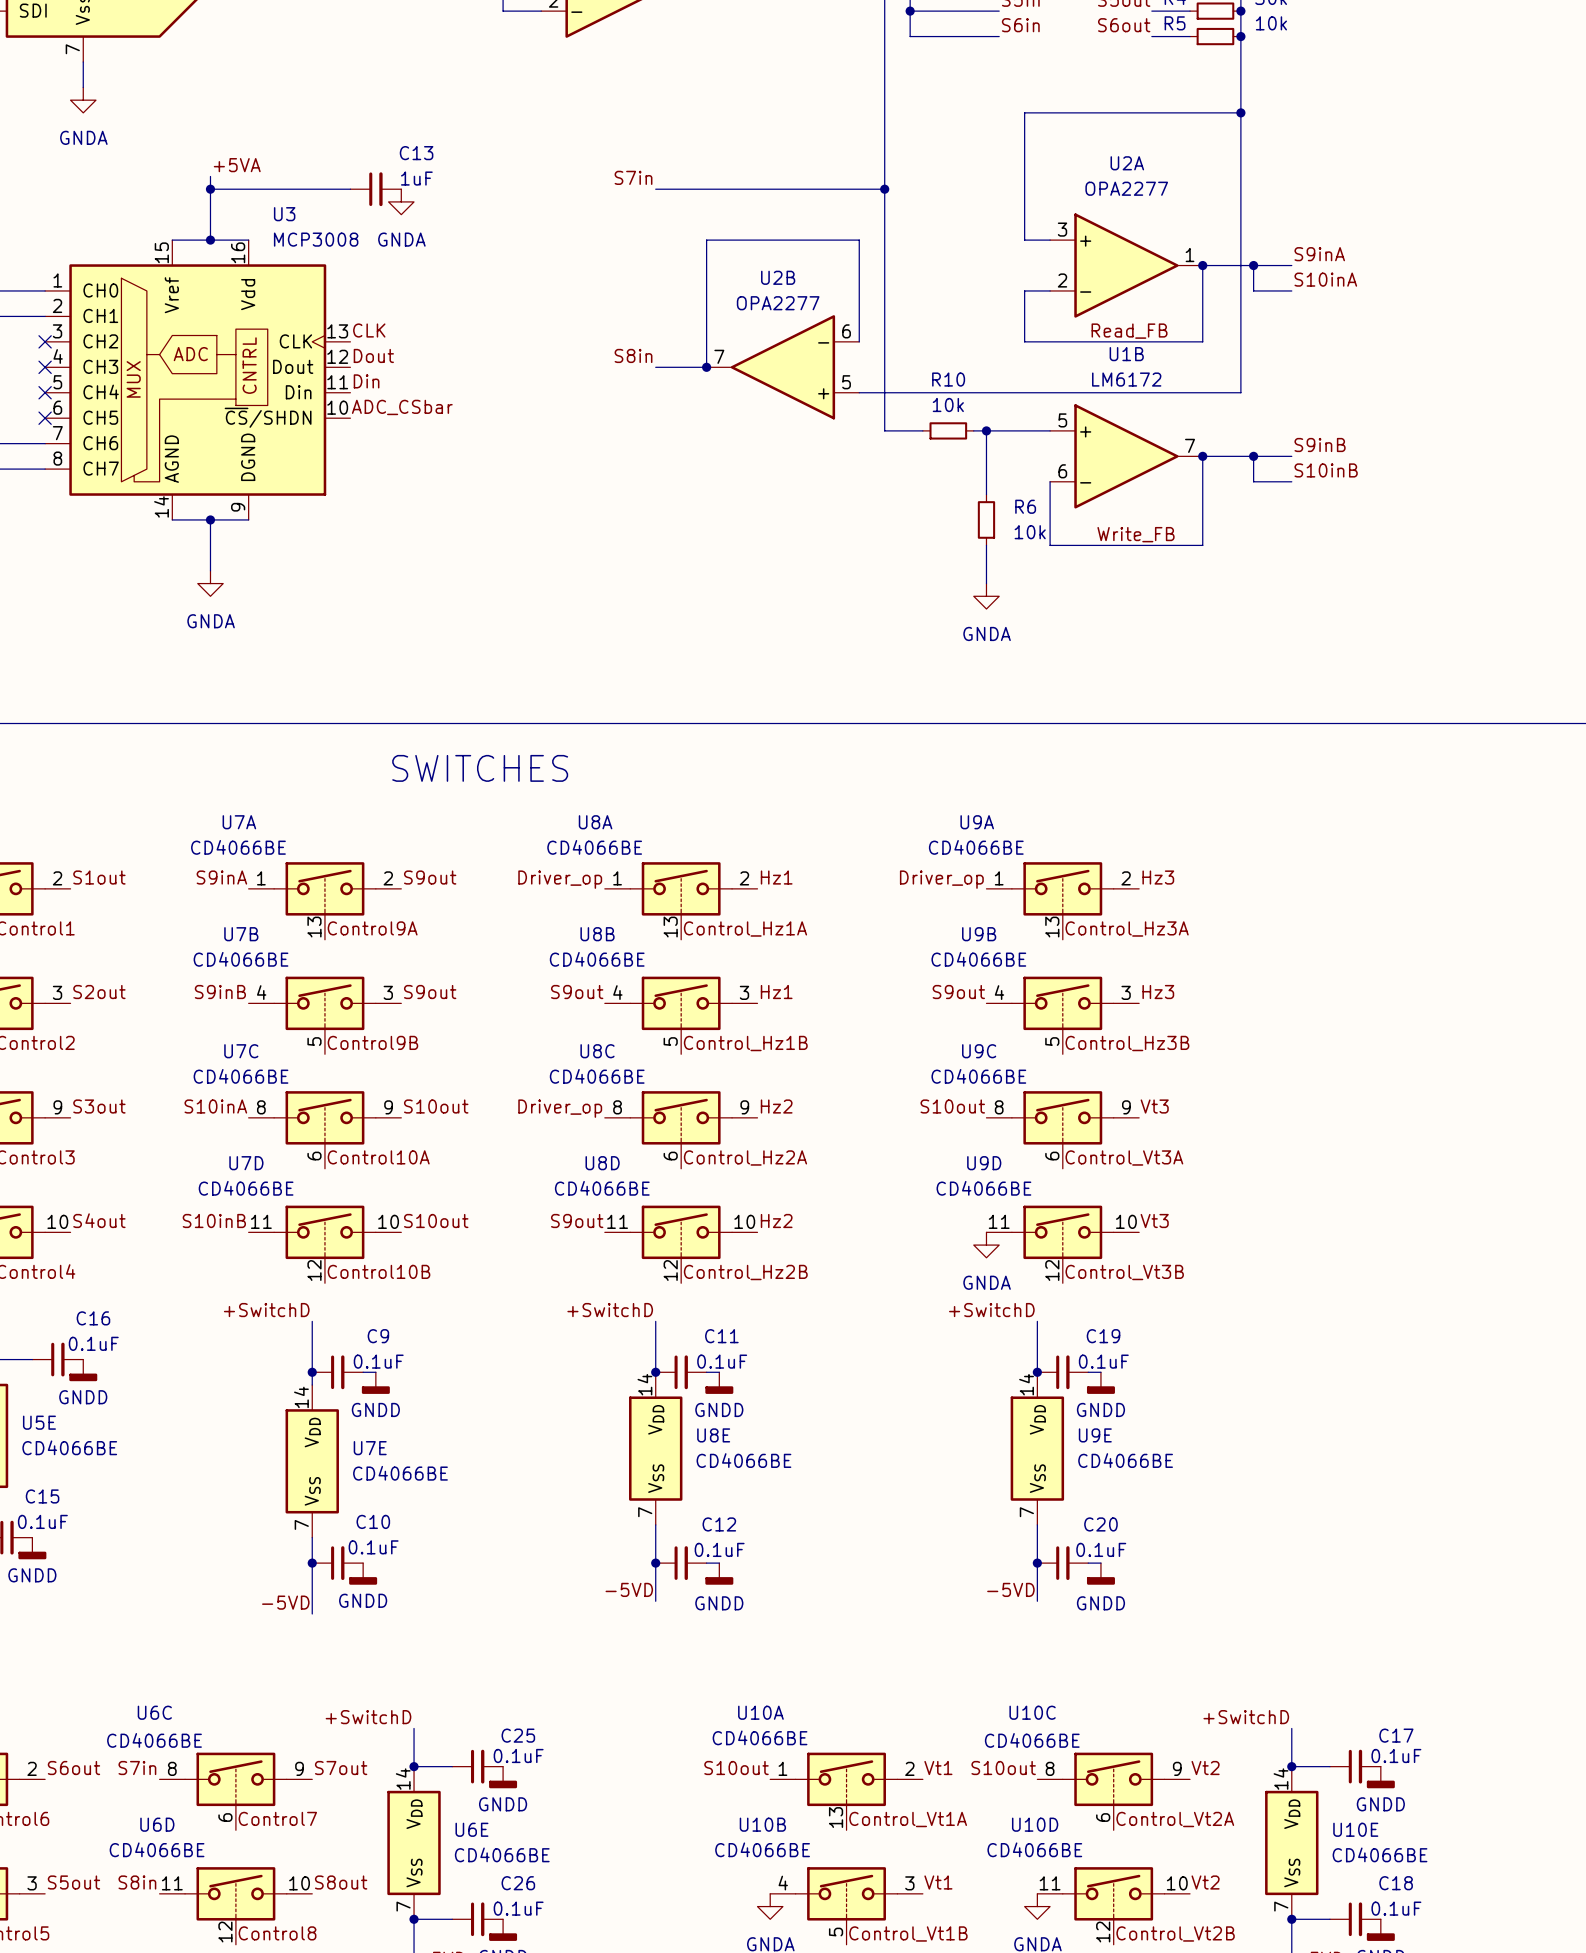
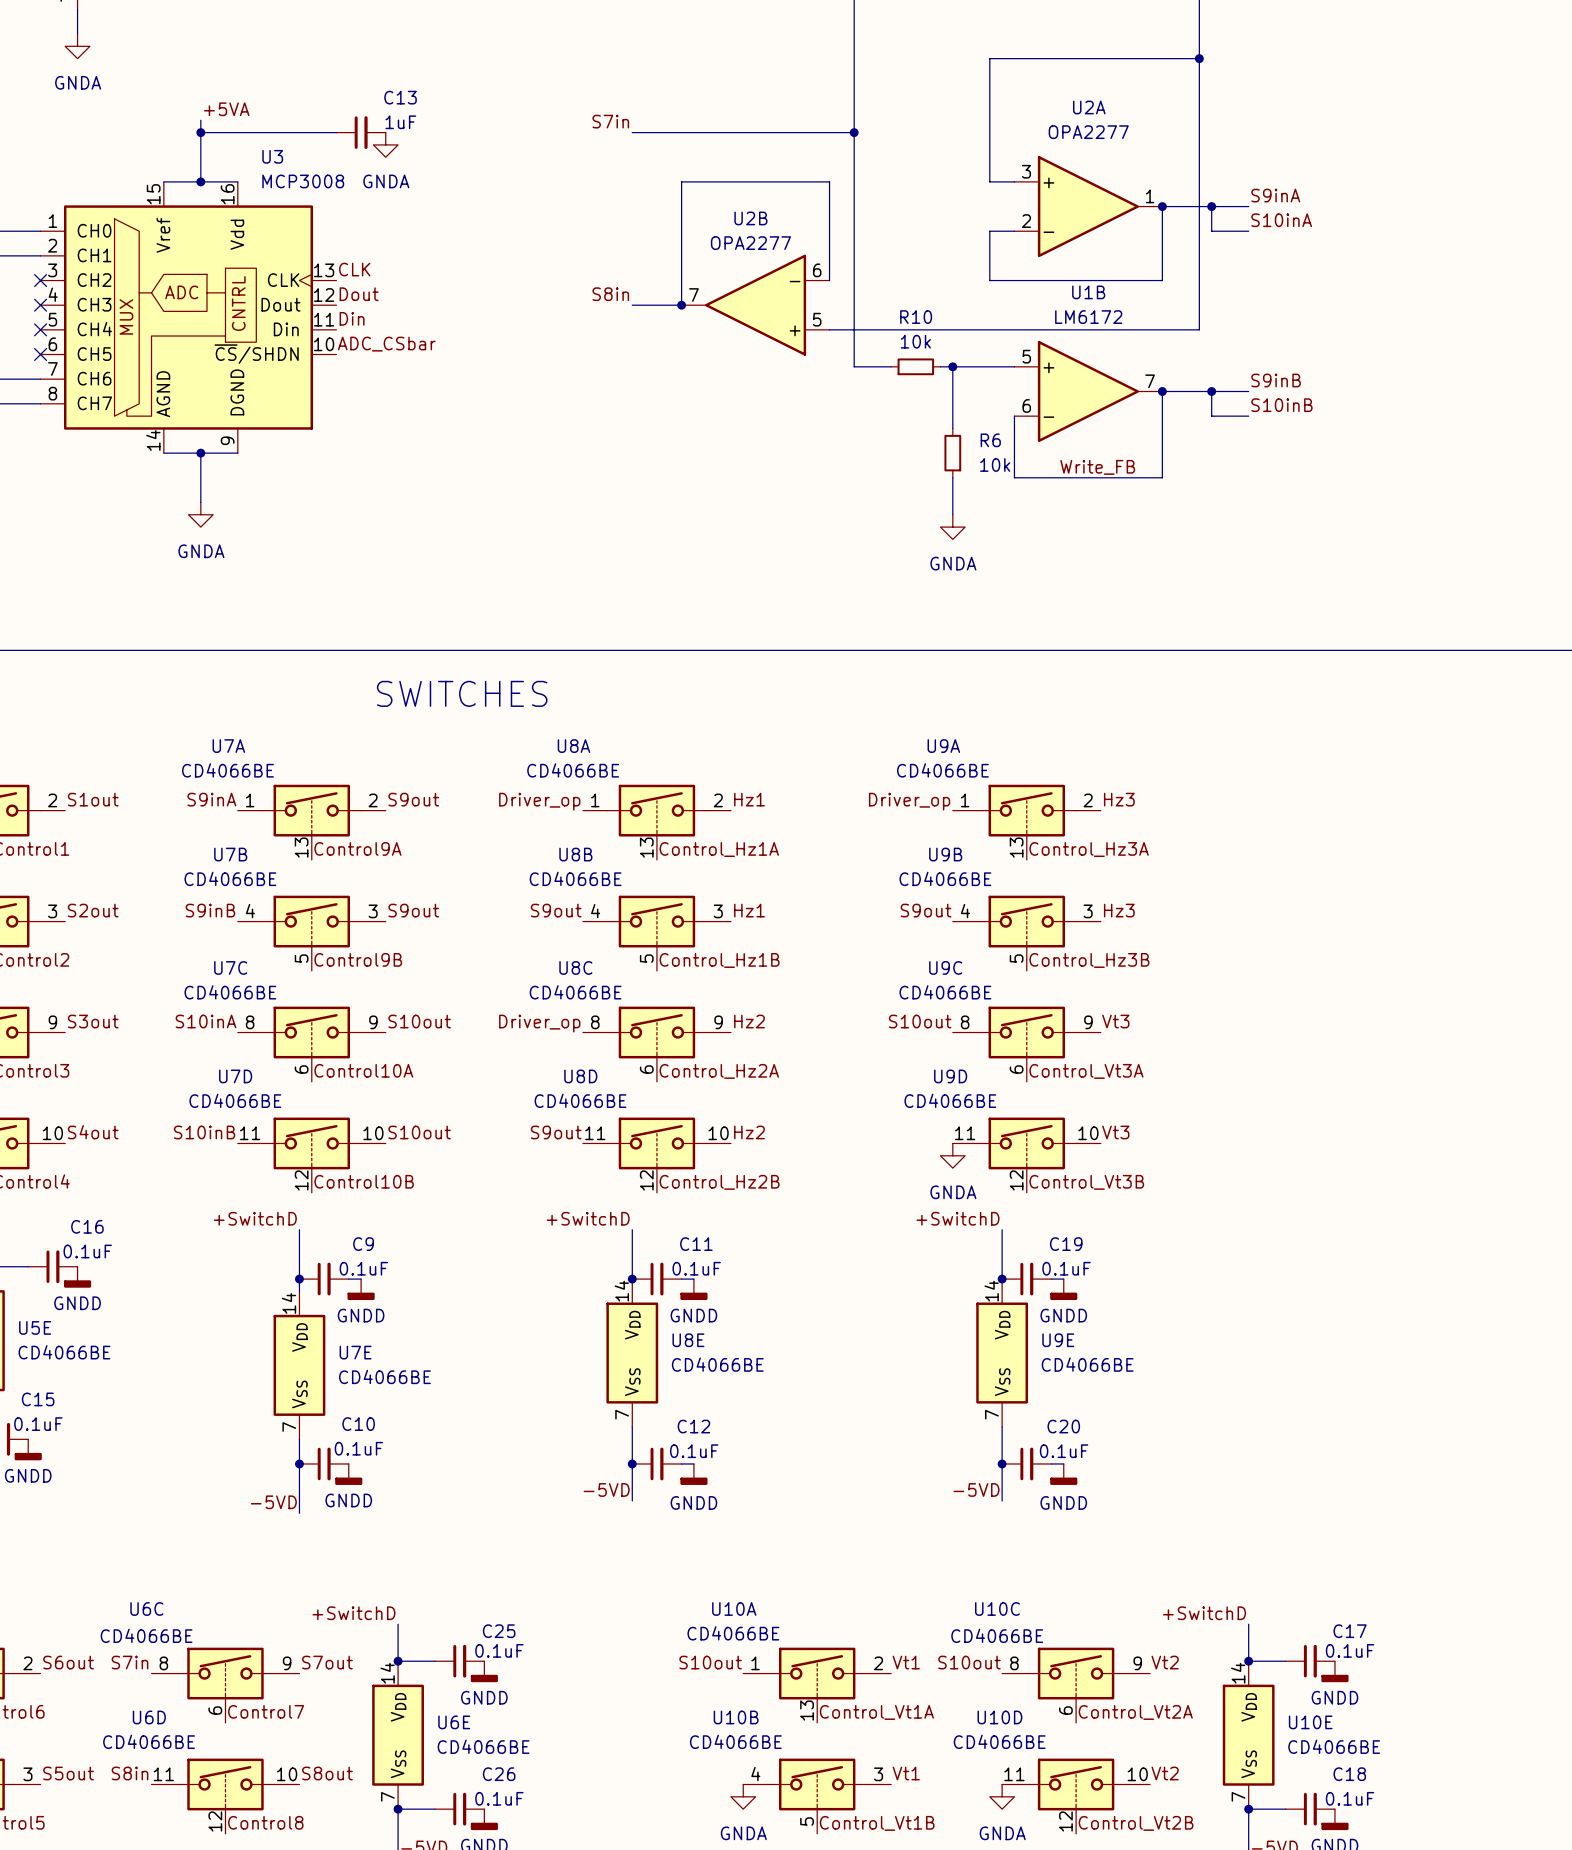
label: Read_FB (1129, 331) -> none

